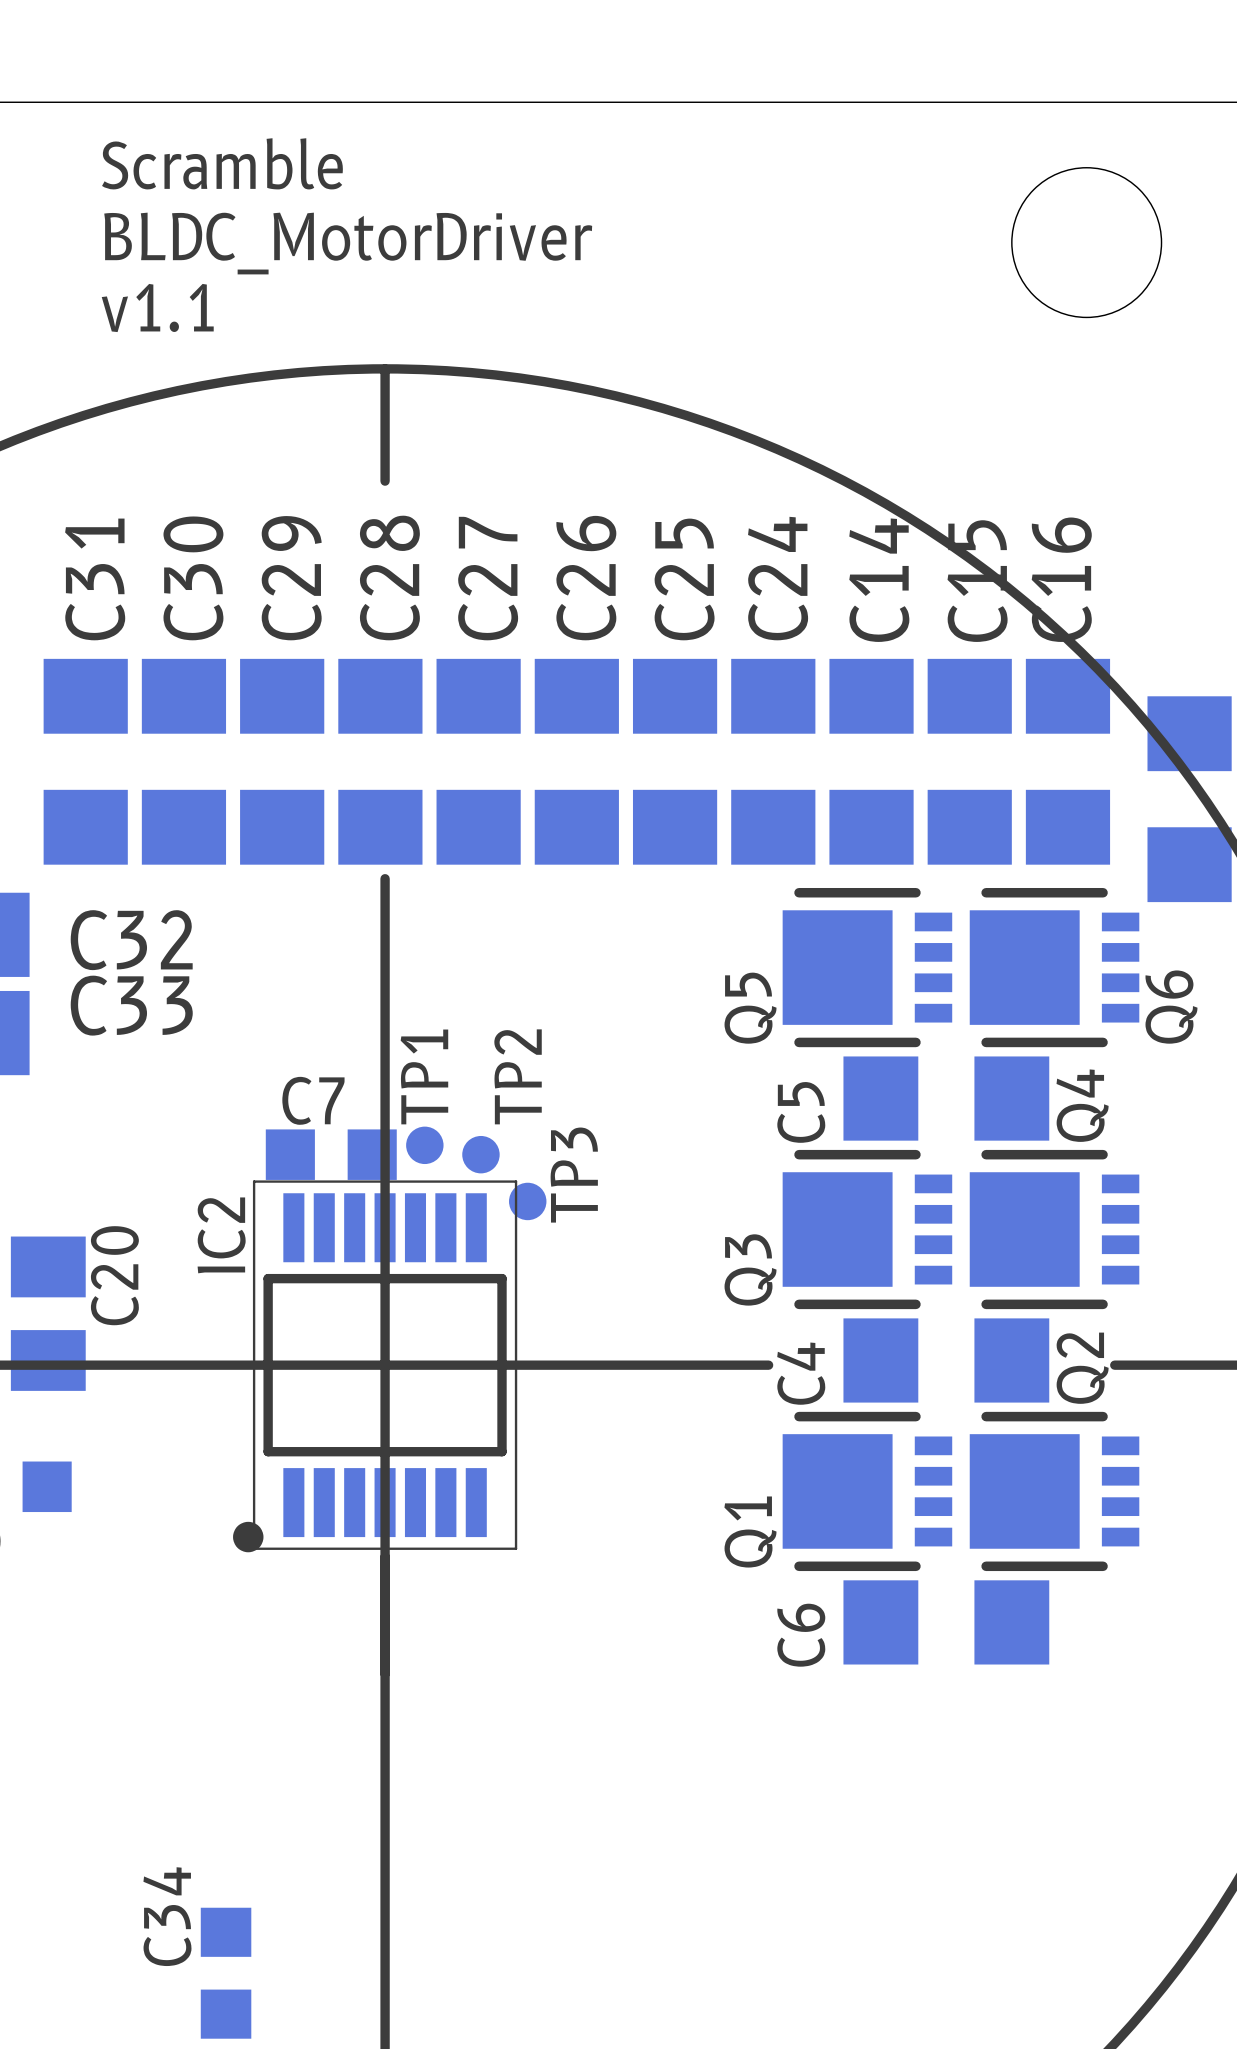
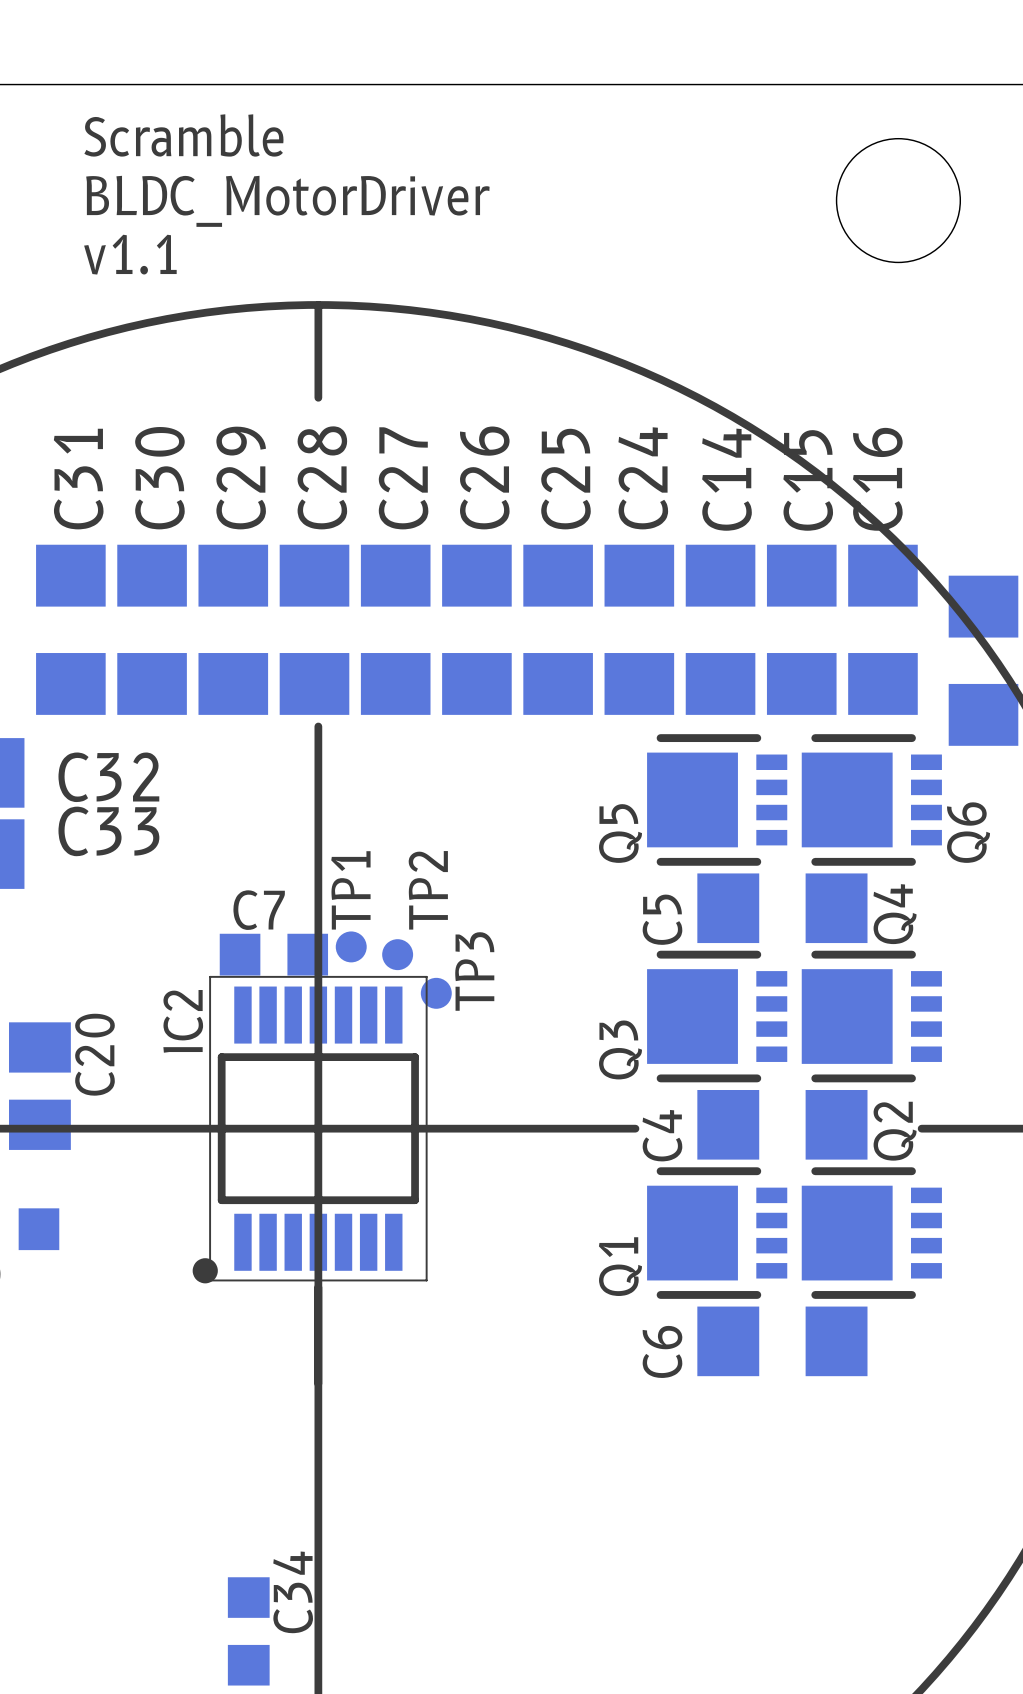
C34 name position: C34 (167, 1916) -> C34 (293, 1592)
C34 position: (226, 1973) -> (248, 1631)

